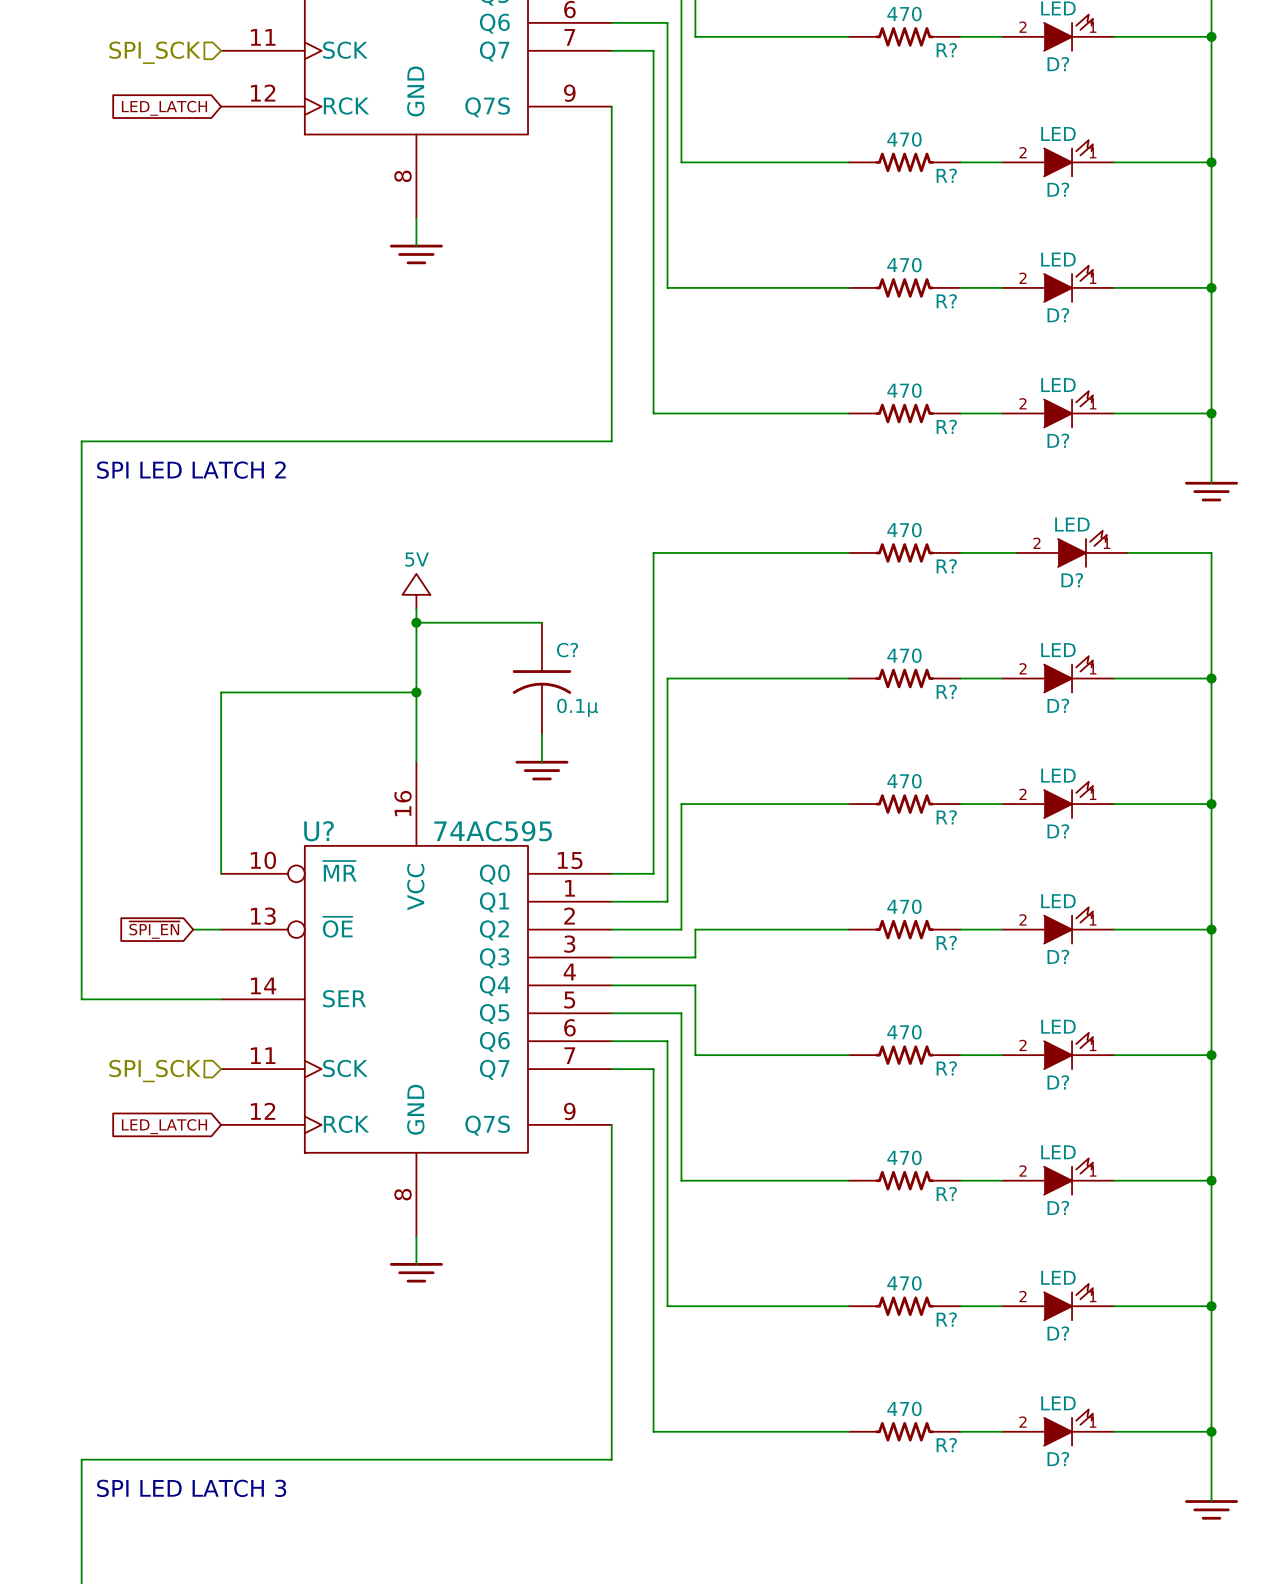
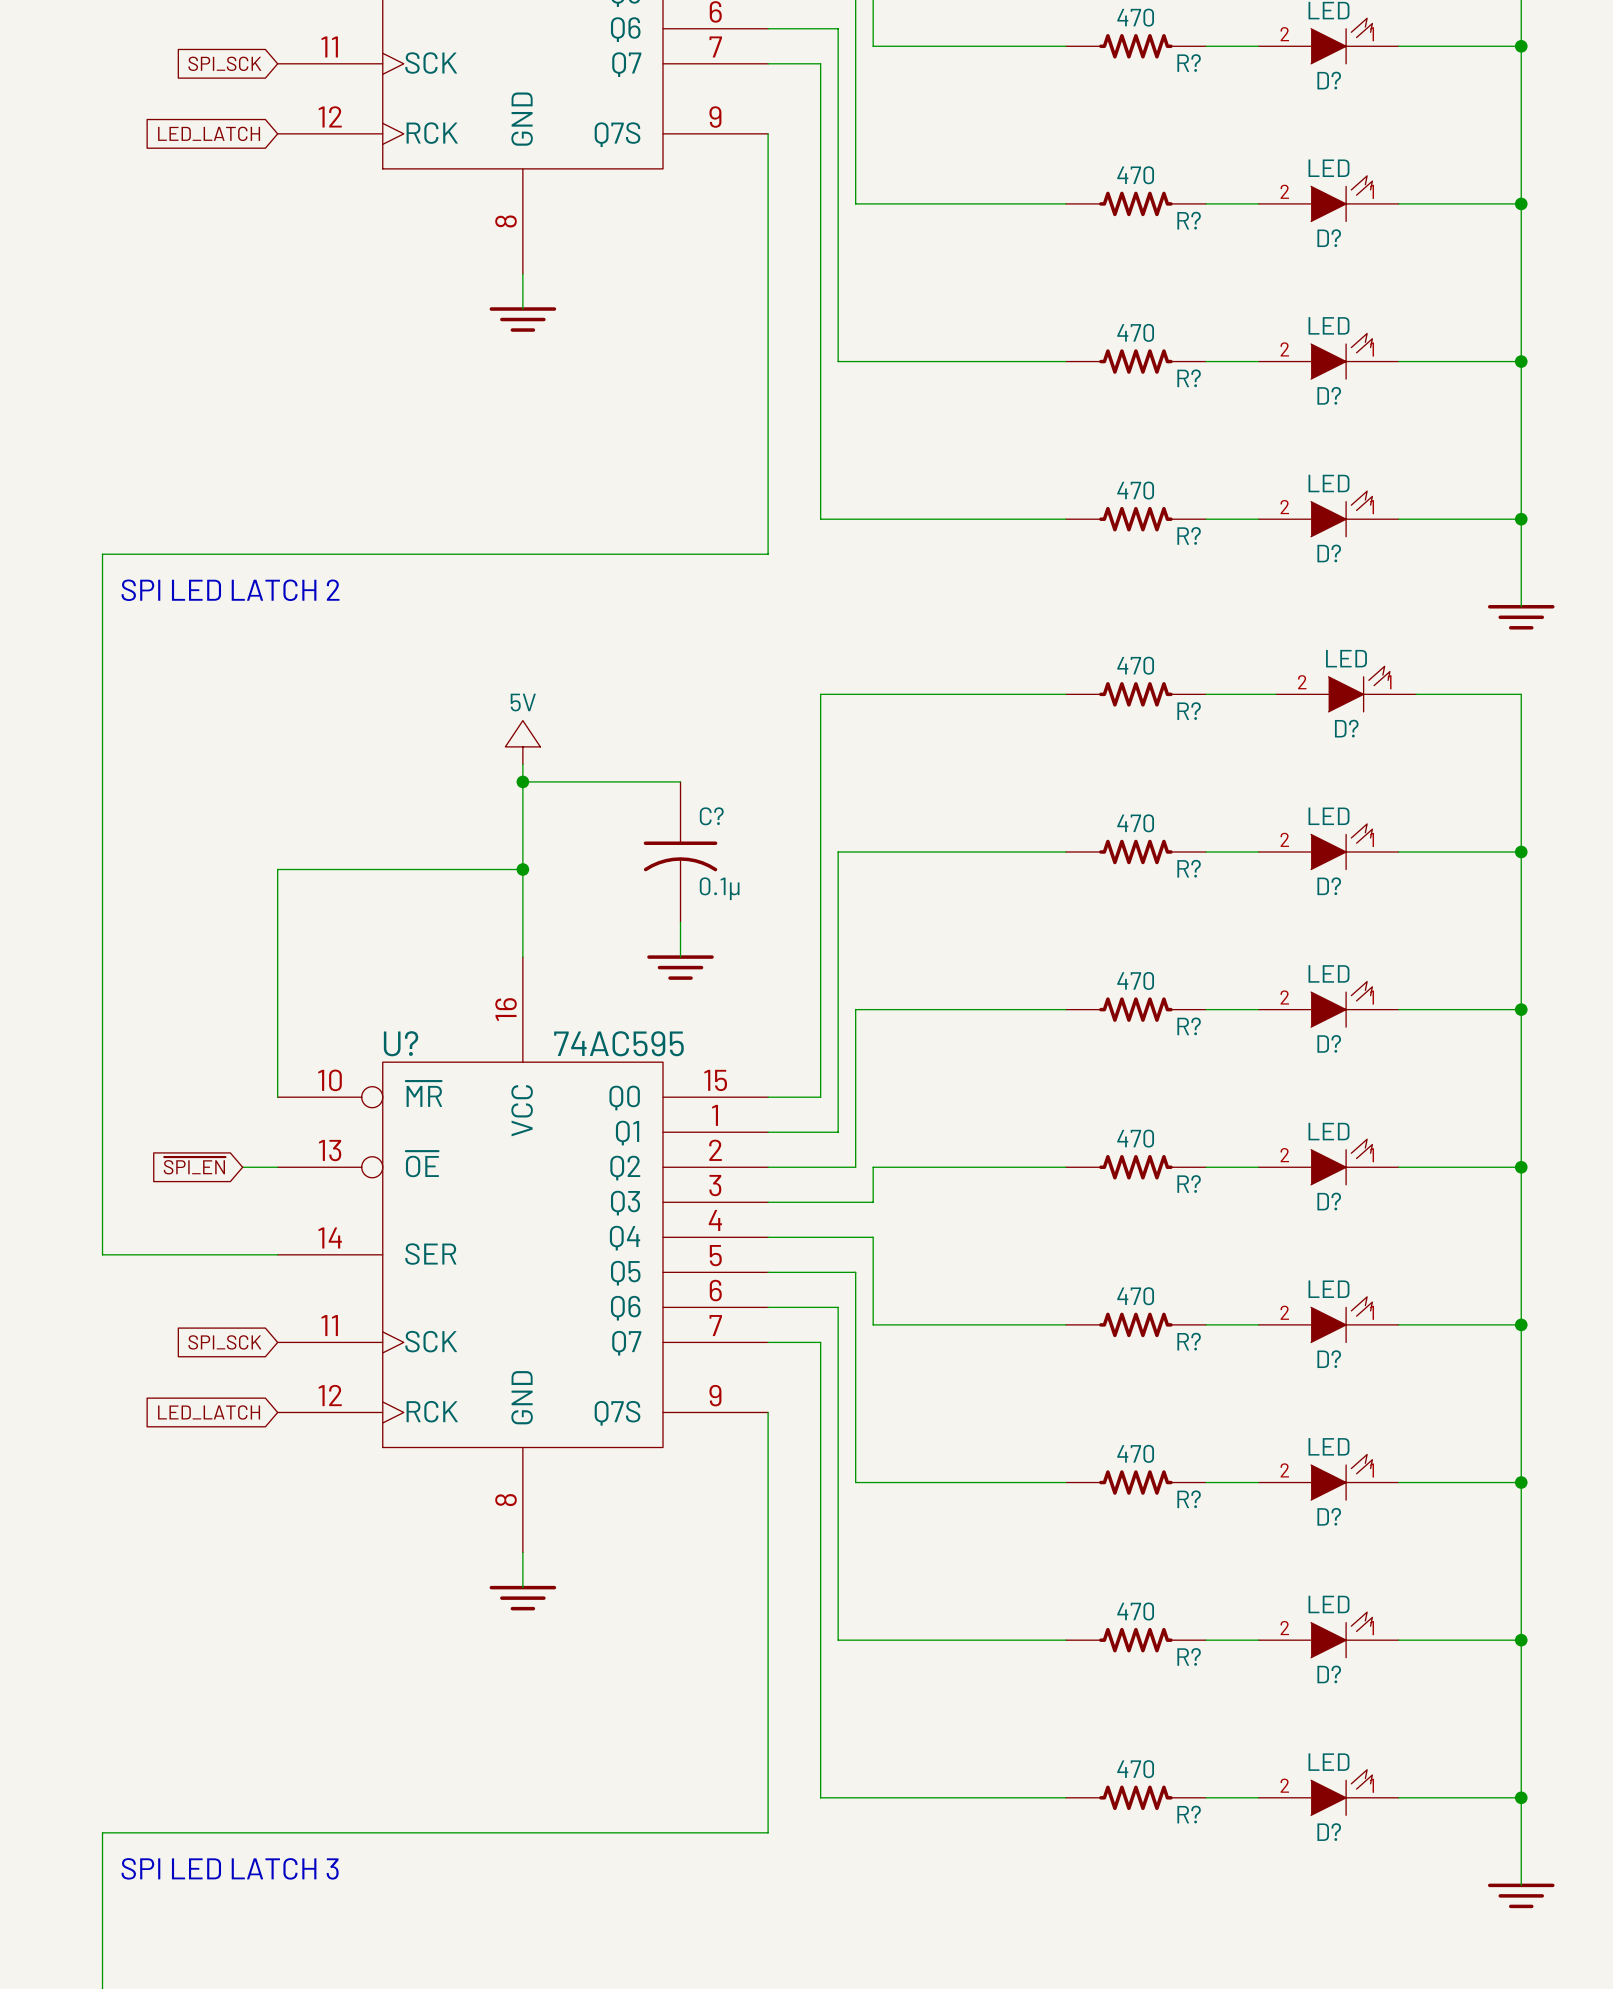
hierarchical label: SPI_SCK (155, 52) -> none
global label: none -> SPI_SCK (224, 63)
global label: none -> SPI_SCK (224, 1342)
hierarchical label: SPI_SCK (155, 1071) -> none

